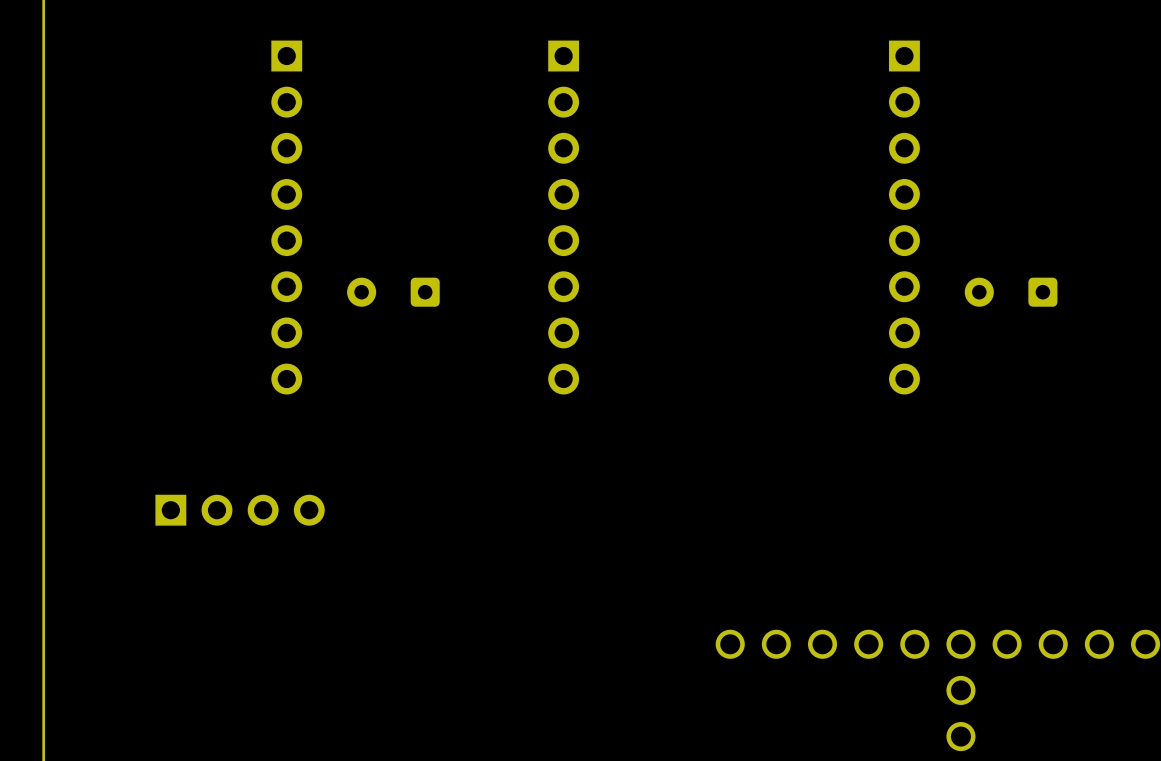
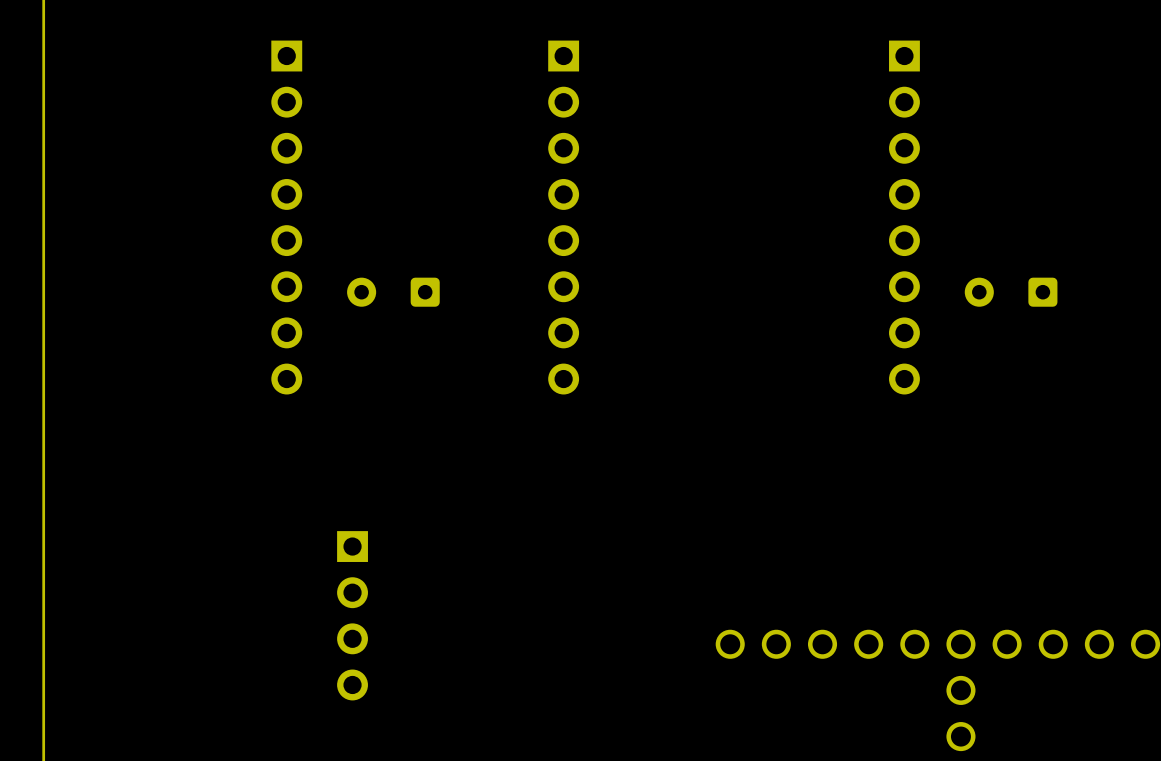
part: (240, 510) -> none
part: none -> (352, 615)

